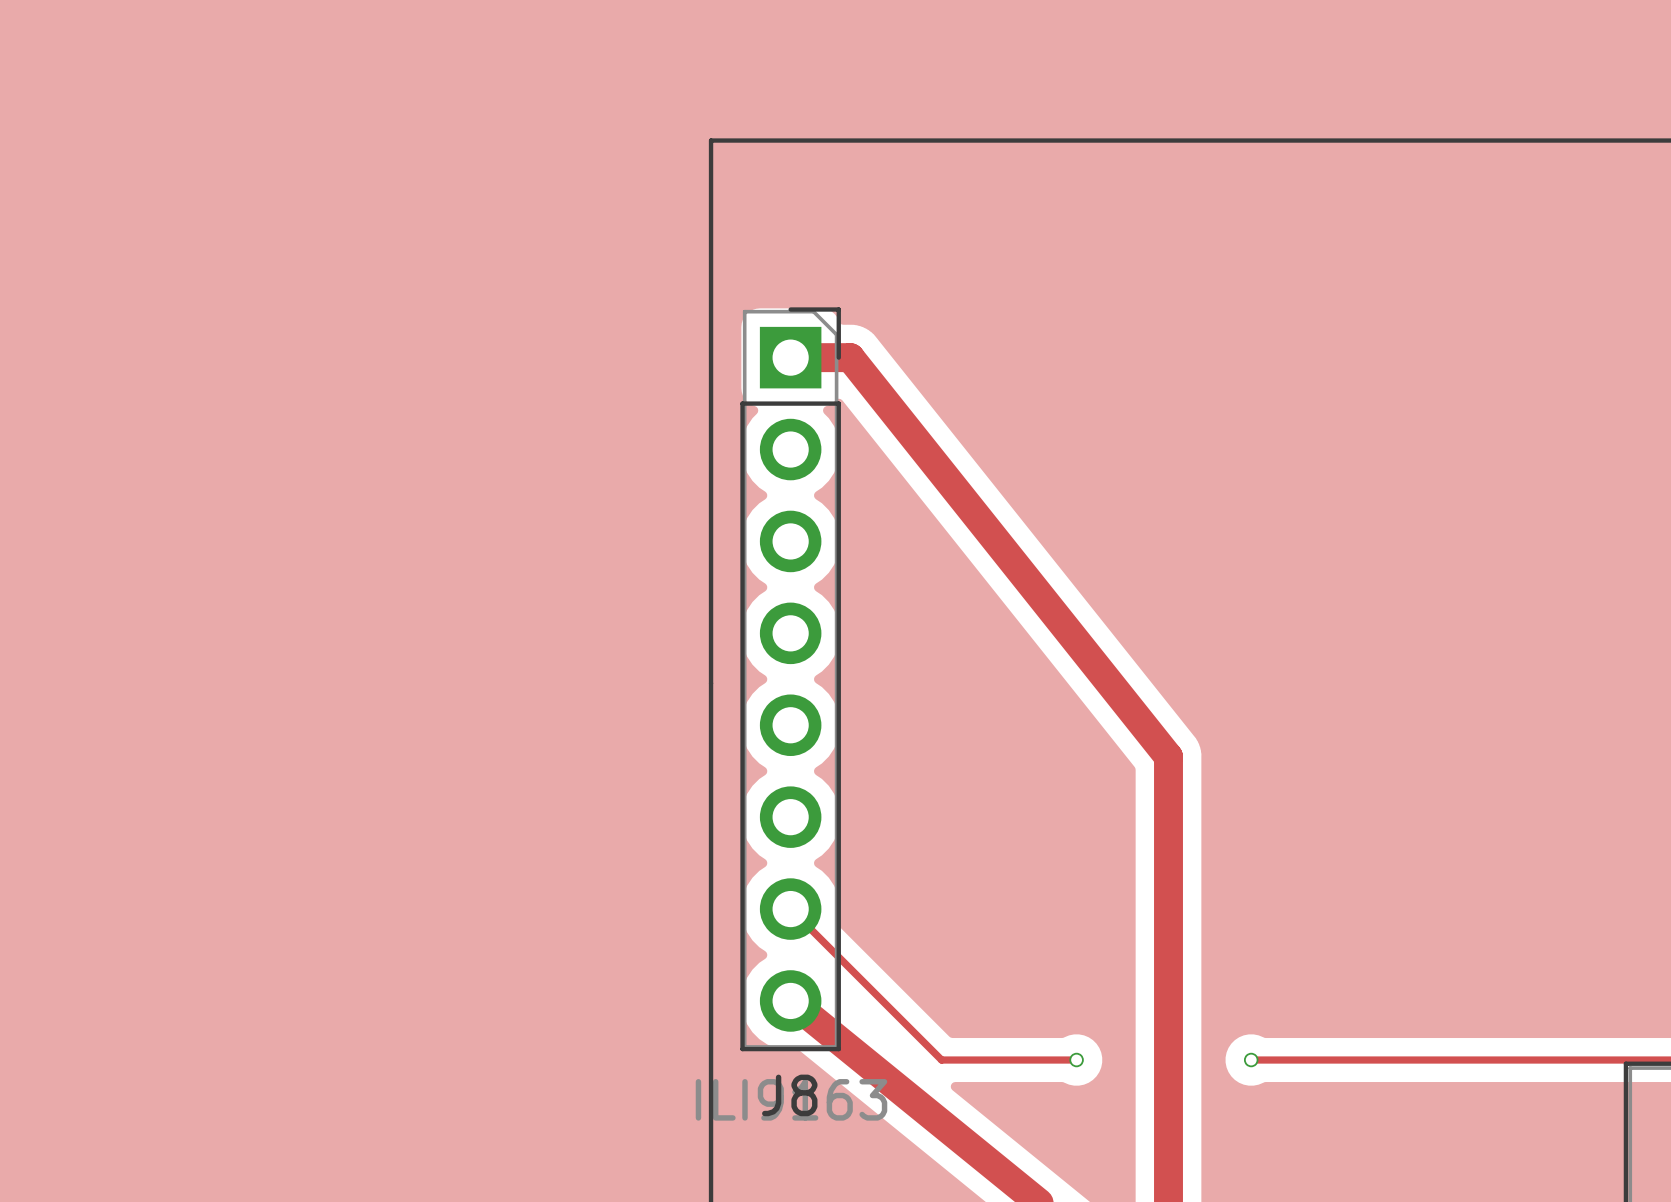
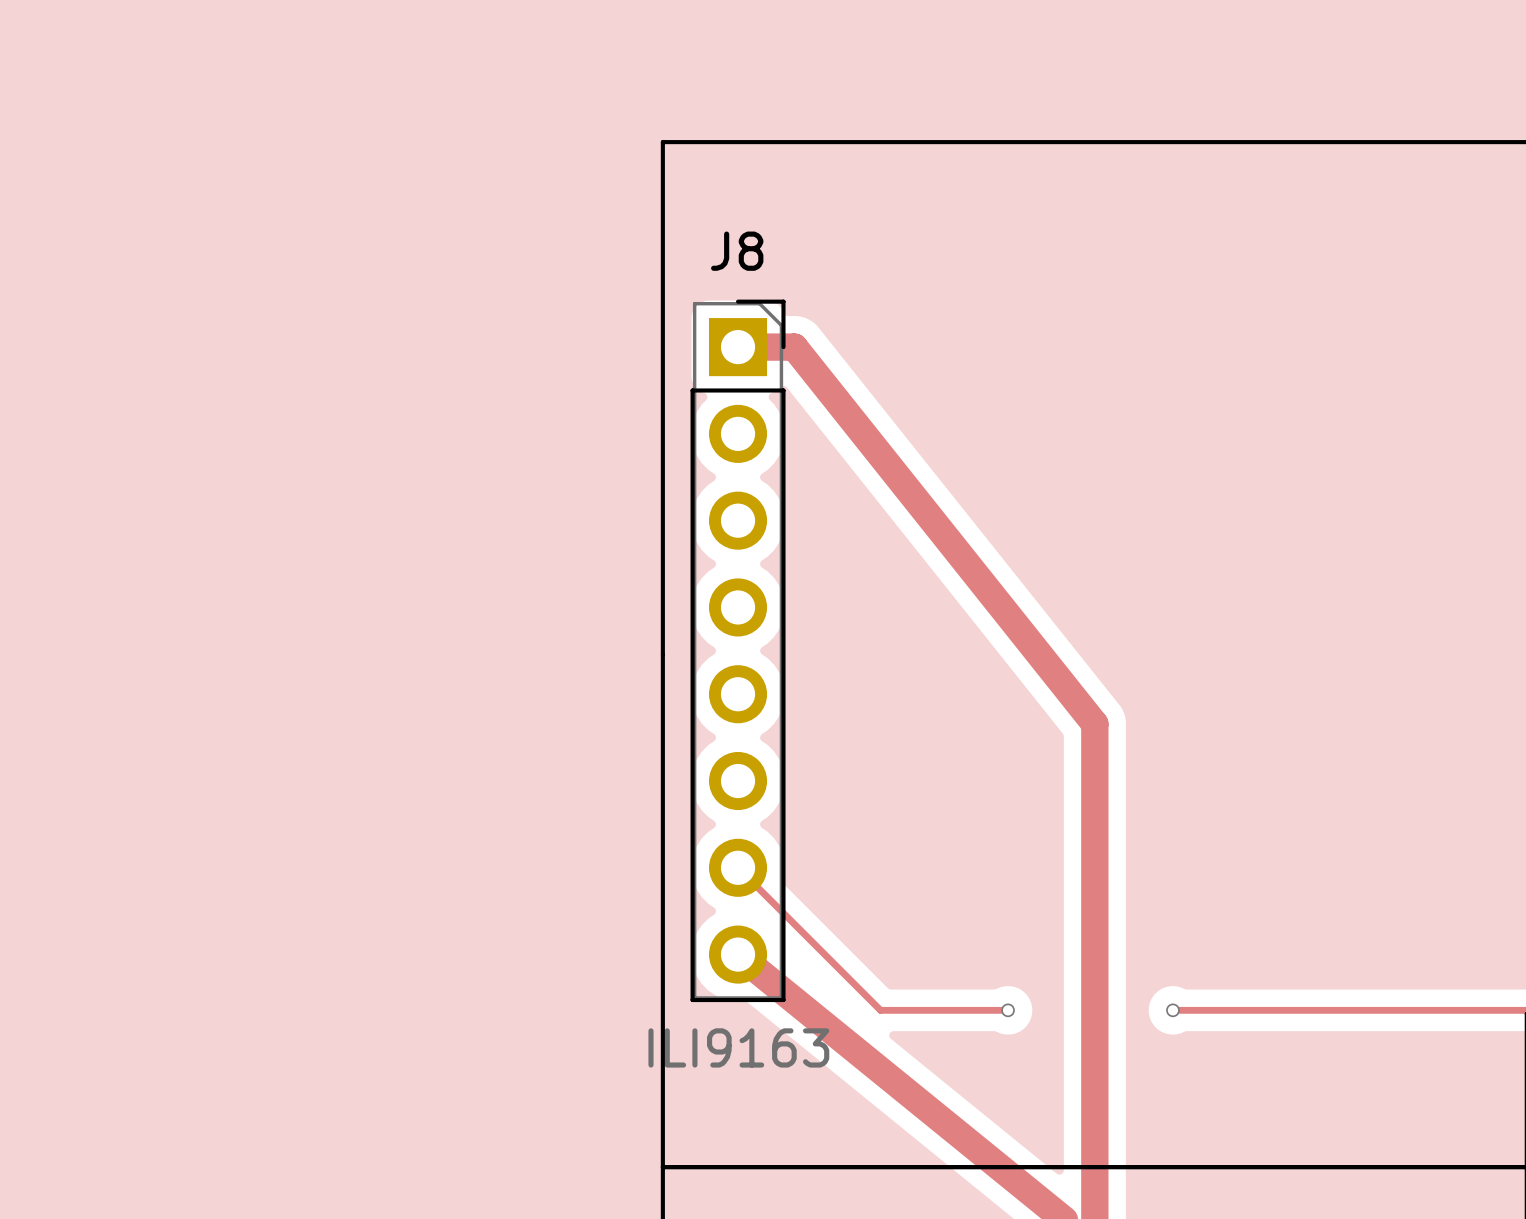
J8 name position: J8 (789, 1095) -> J8 (737, 251)

